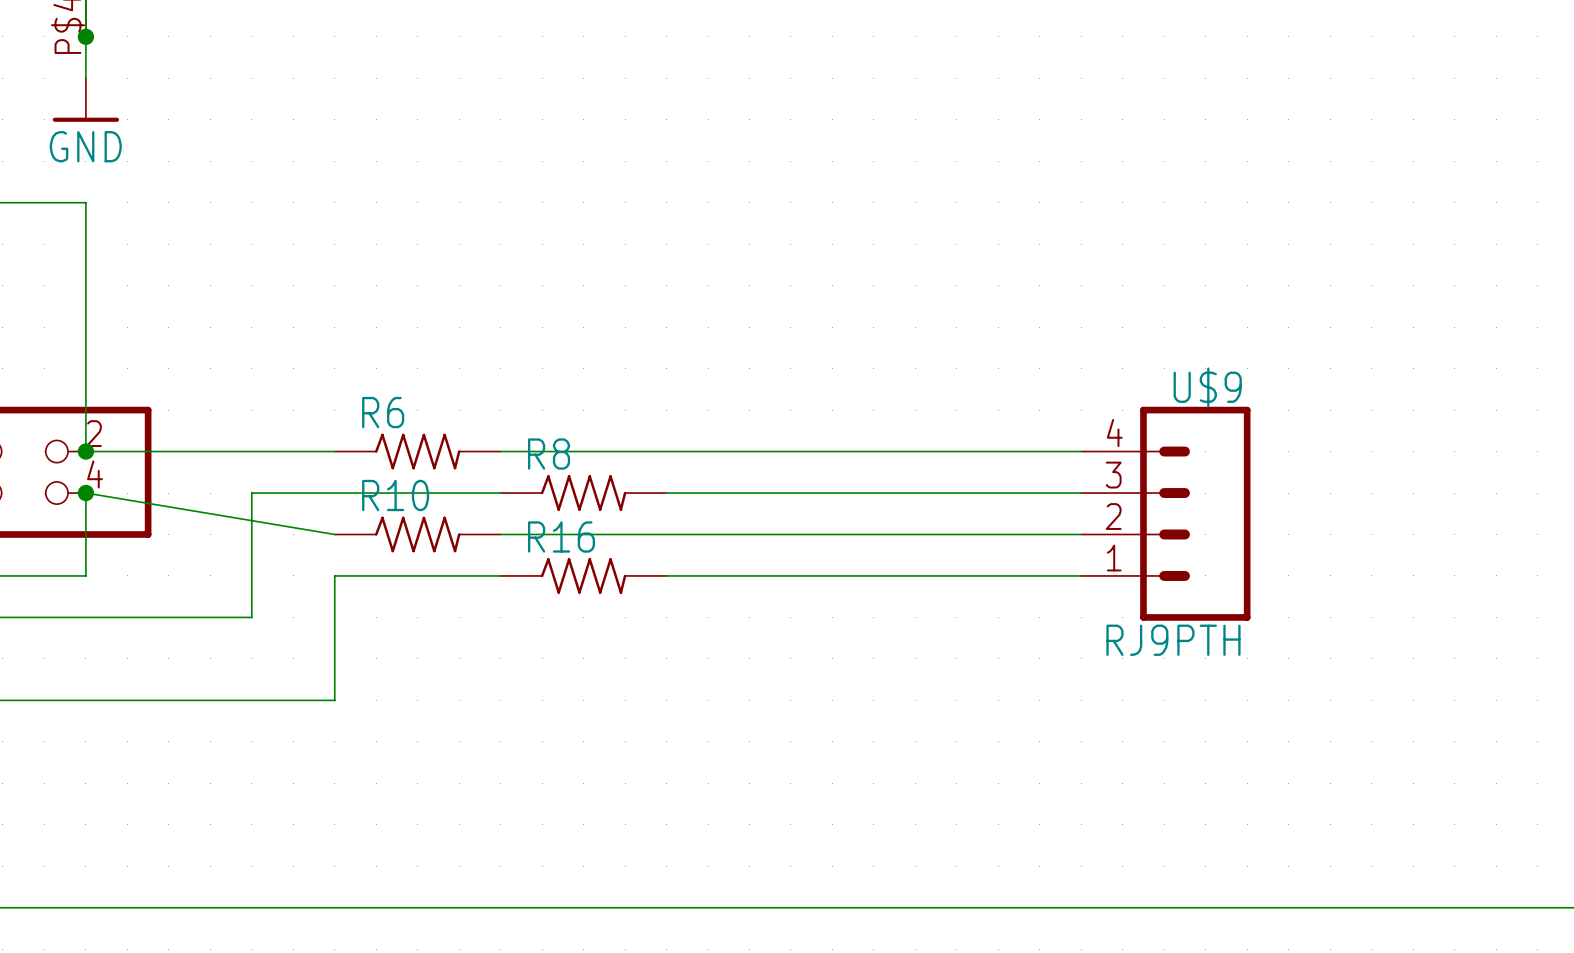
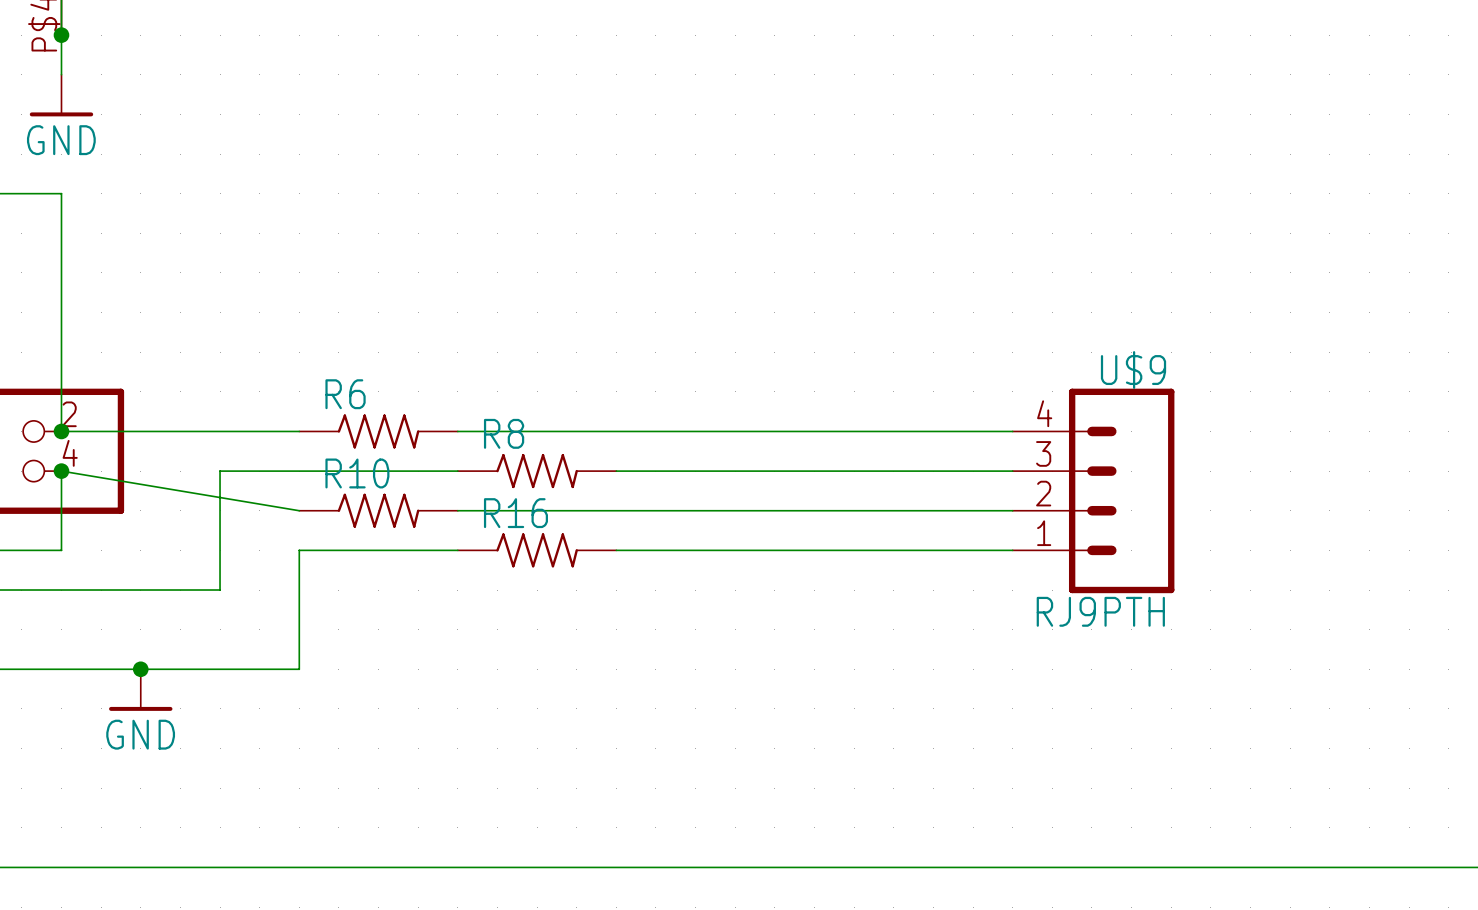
junction: none -> (140, 669)
power symbol: none -> GND (140, 690)

